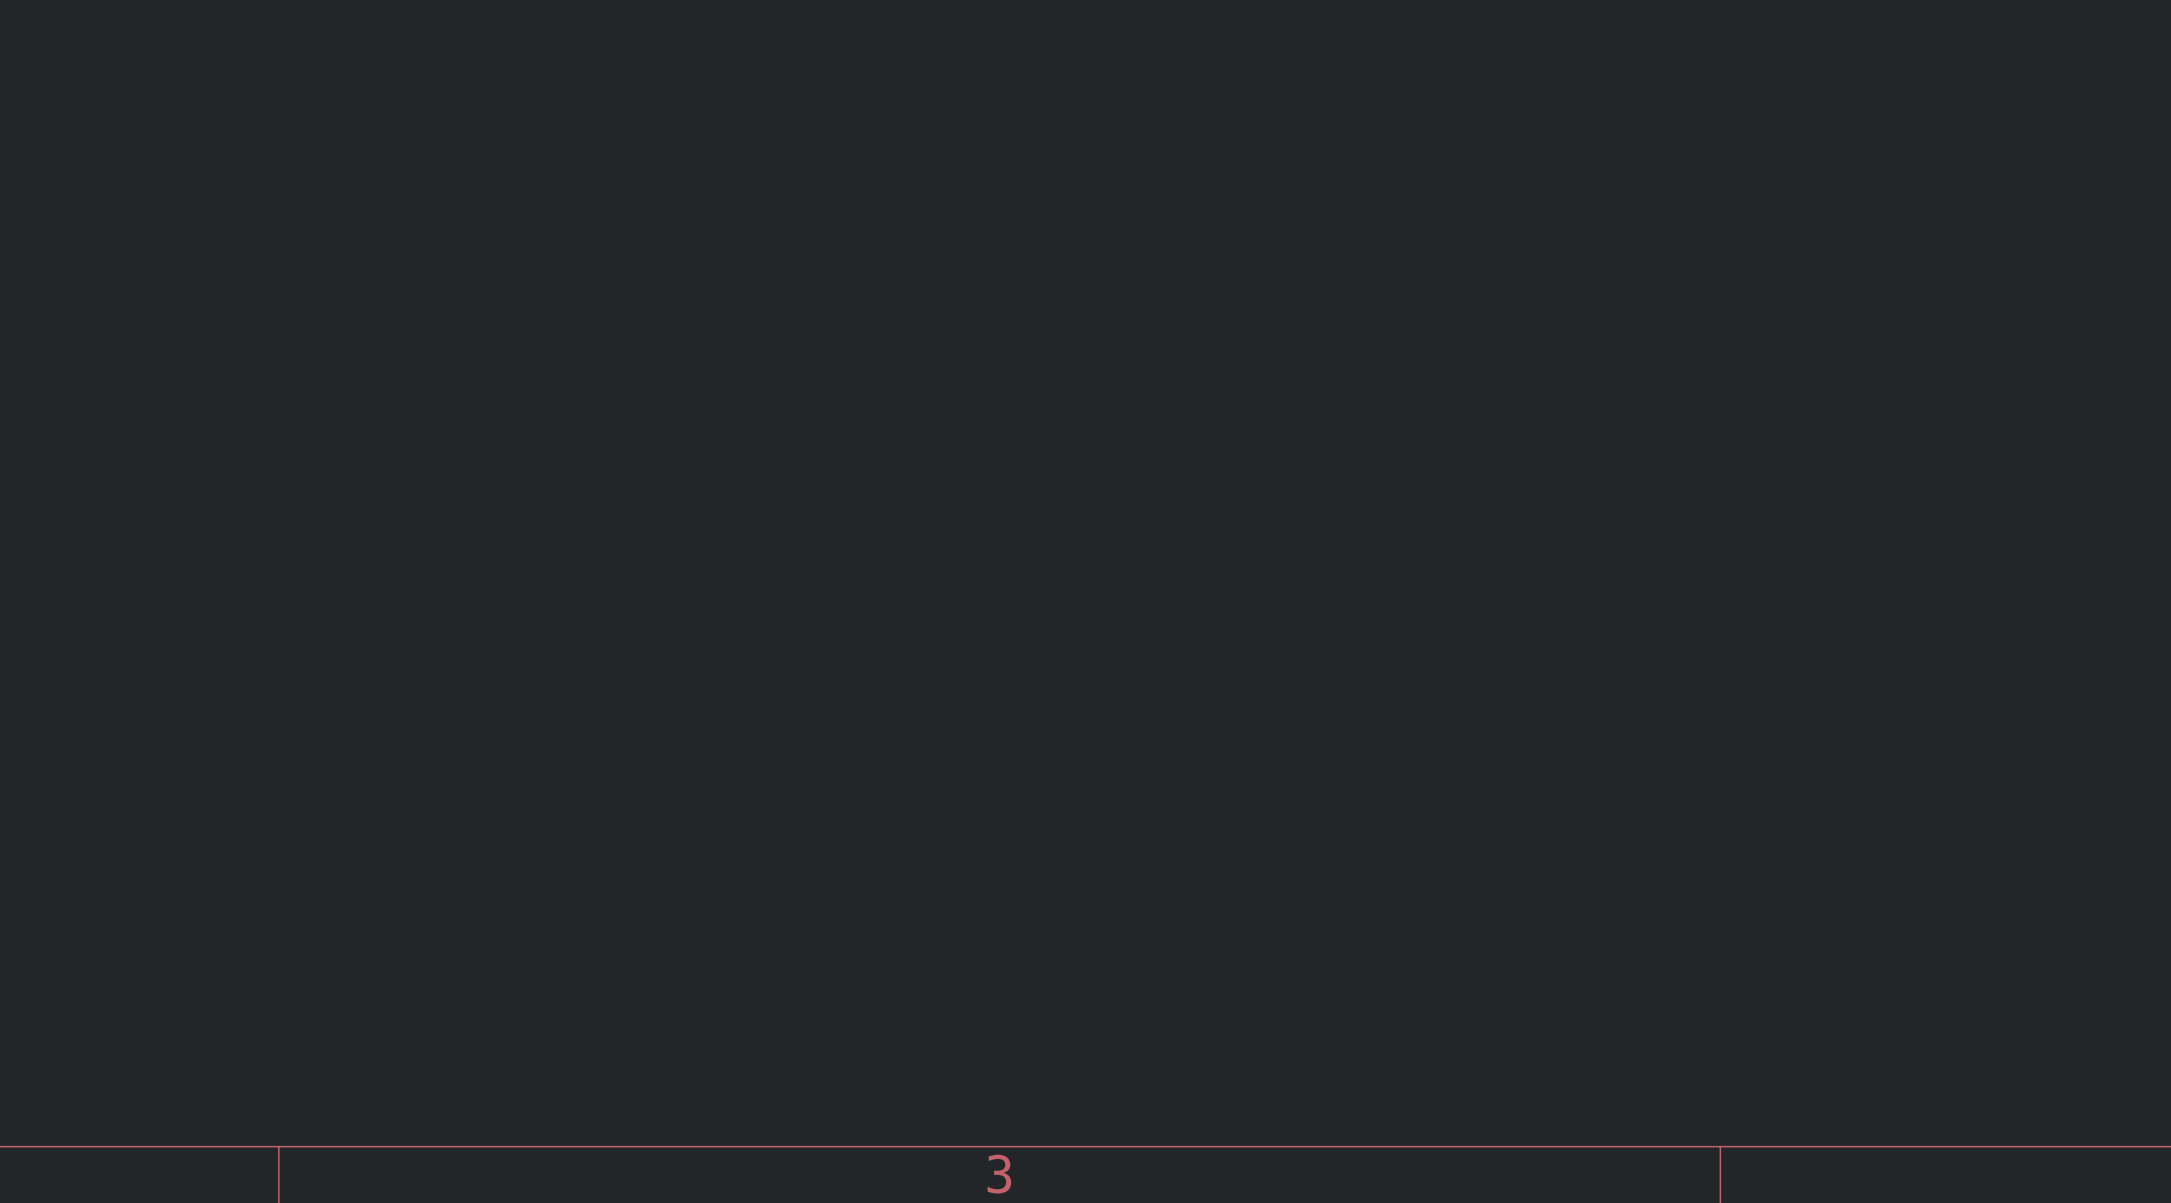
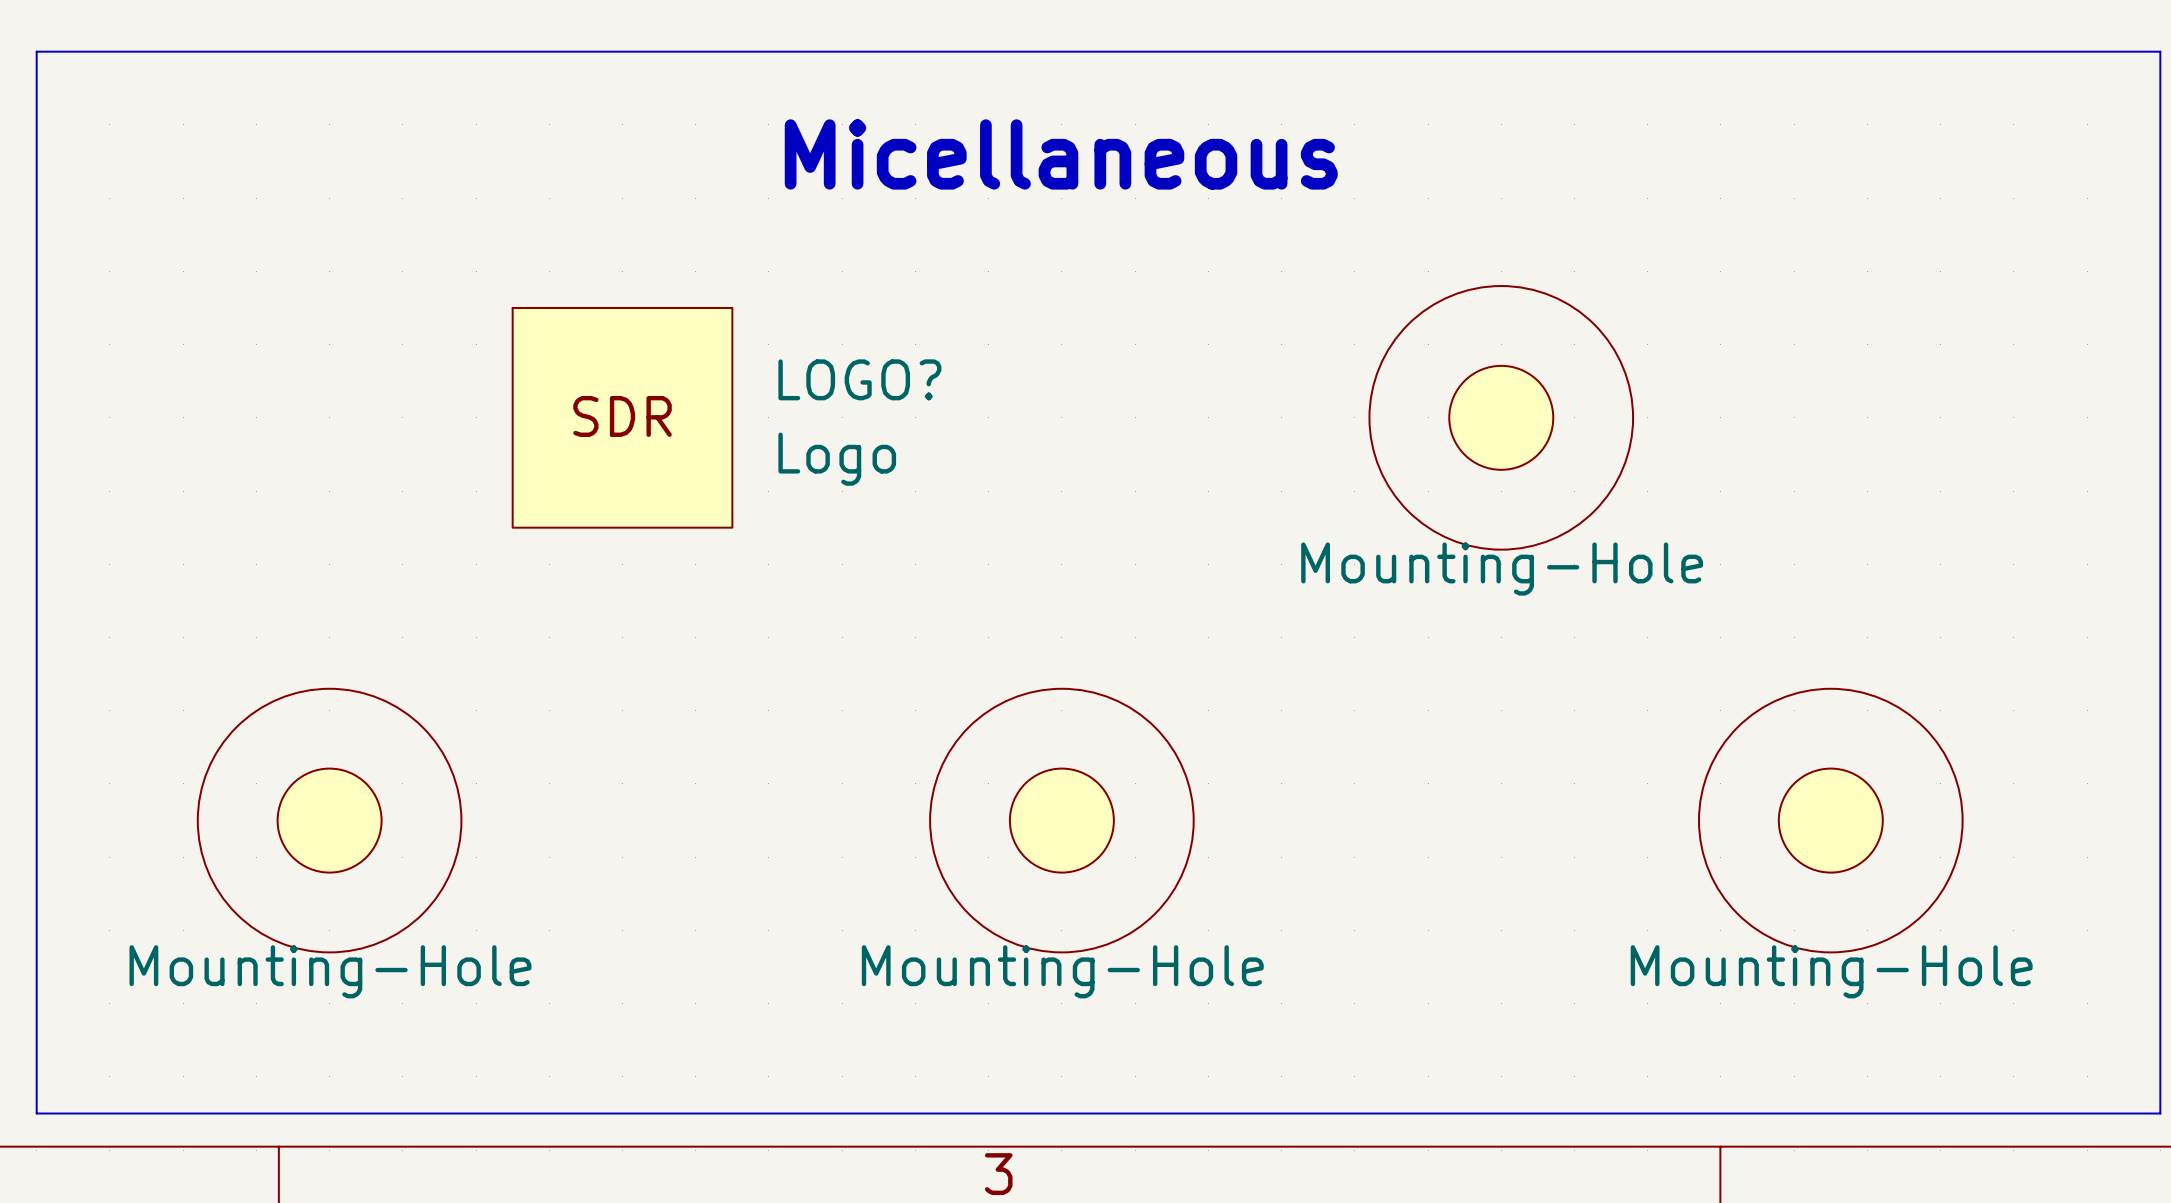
line: none -> (36, 51) (36, 1113) (2160, 1113) (2160, 51) (36, 51)
text: none -> Micellaneous (1061, 154)
LOGO?: none -> Logo (622, 417)
part: none -> Mounting-Hole (1501, 417)
part: none -> Mounting-Hole (329, 820)
part: none -> Mounting-Hole (1061, 820)
part: none -> Mounting-Hole (1830, 820)

